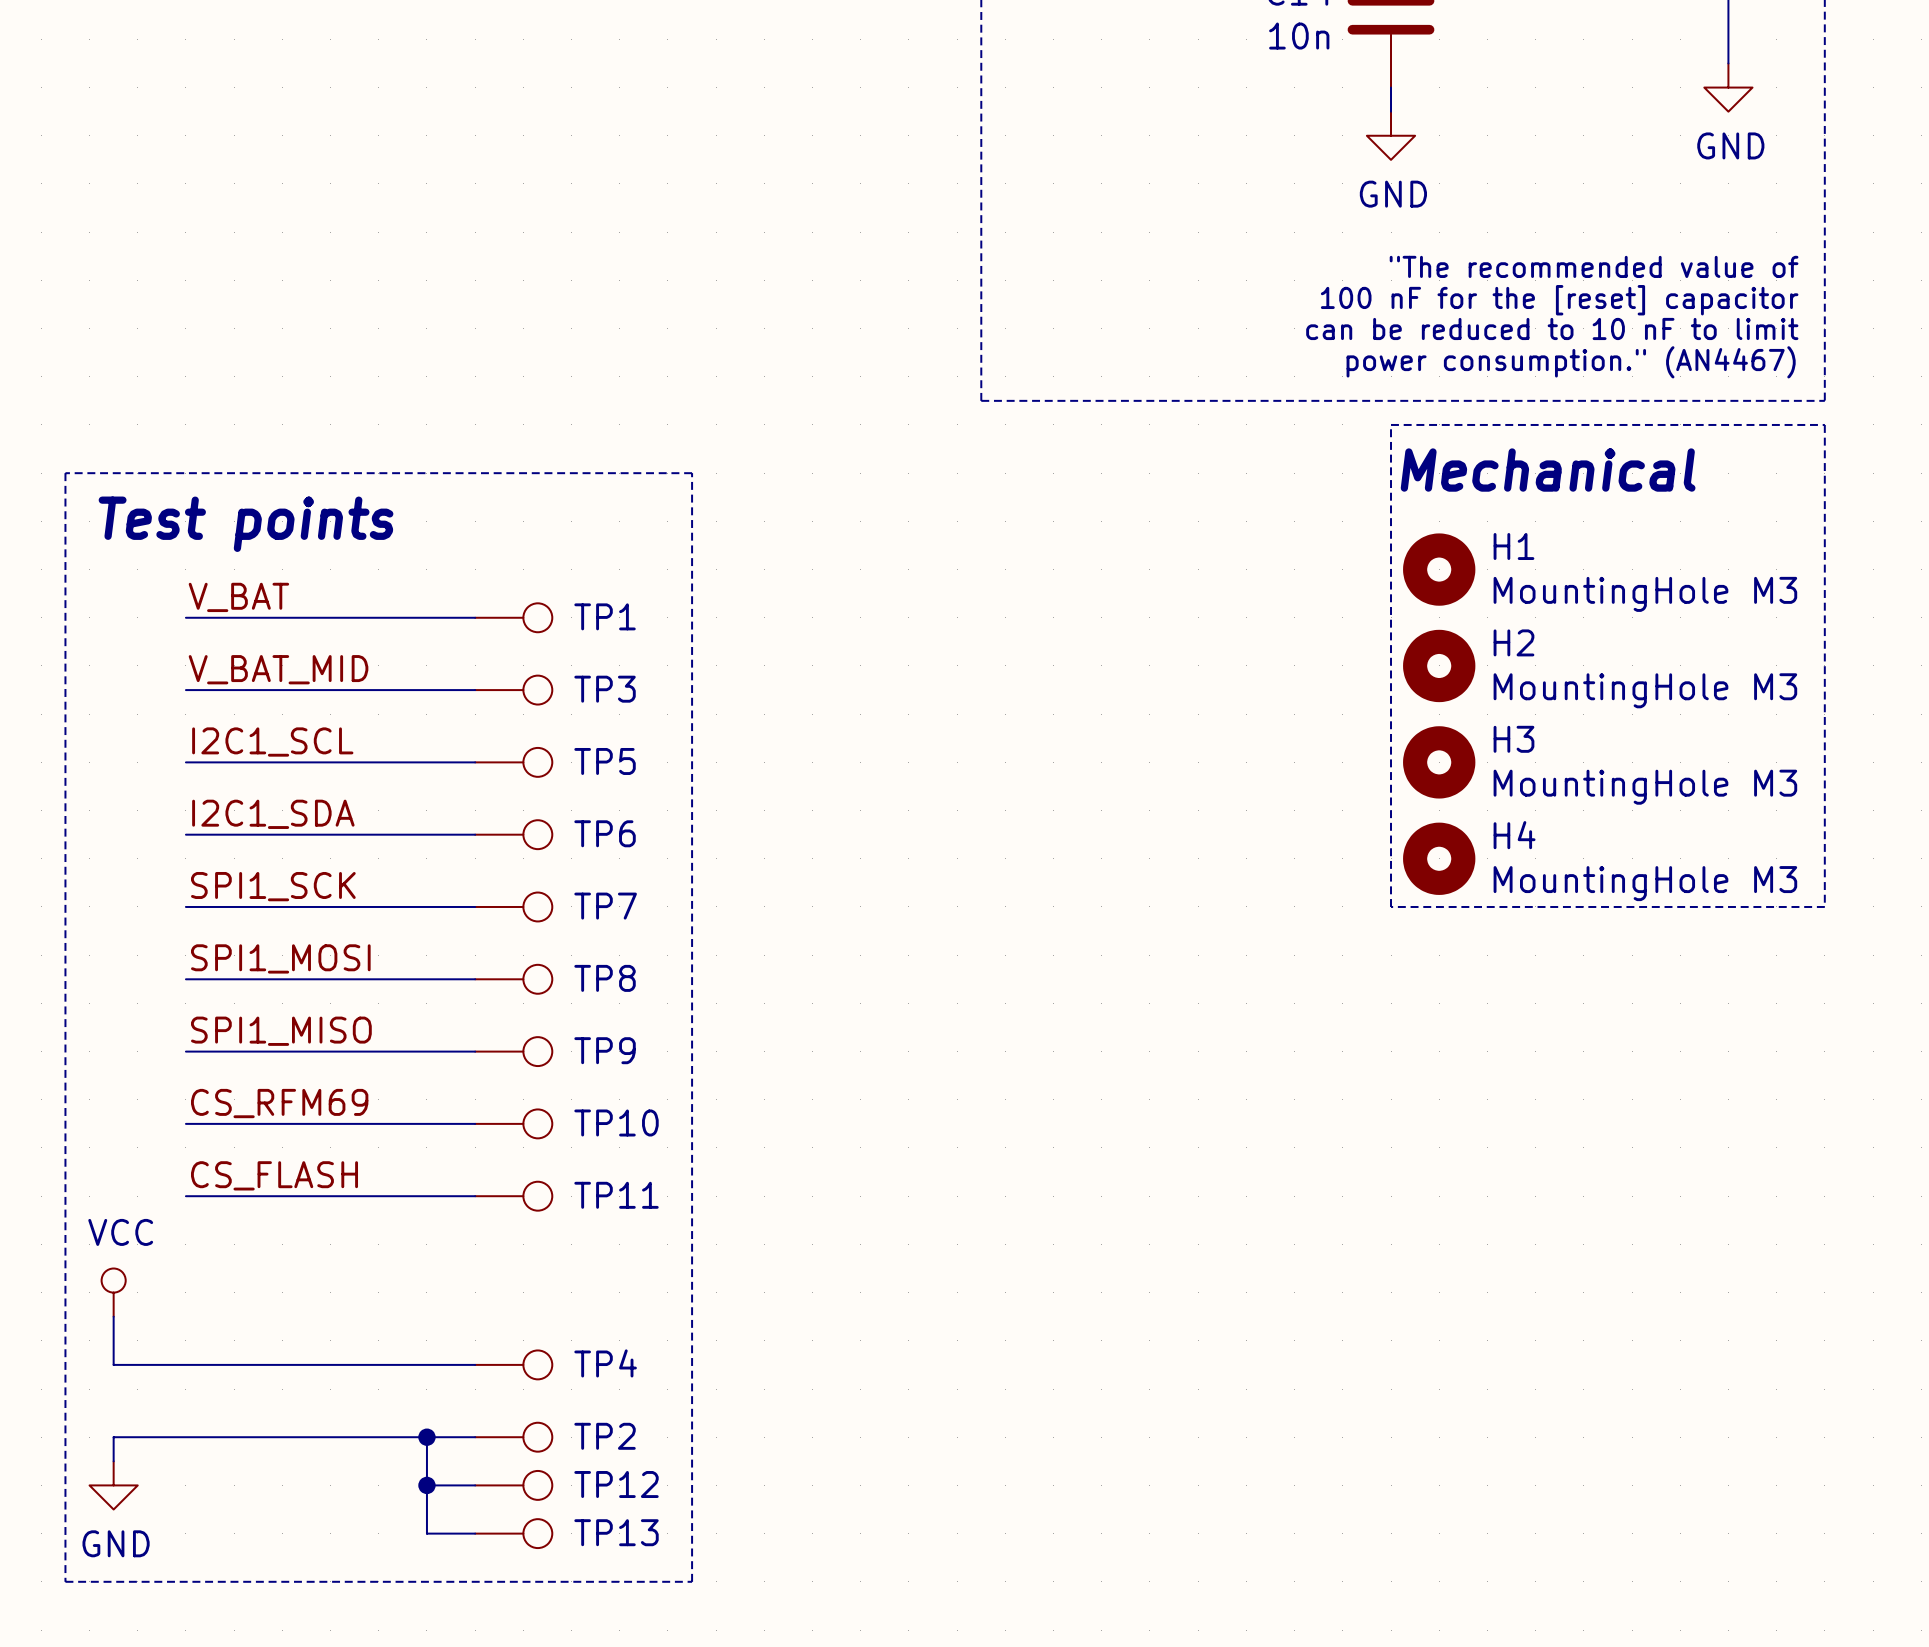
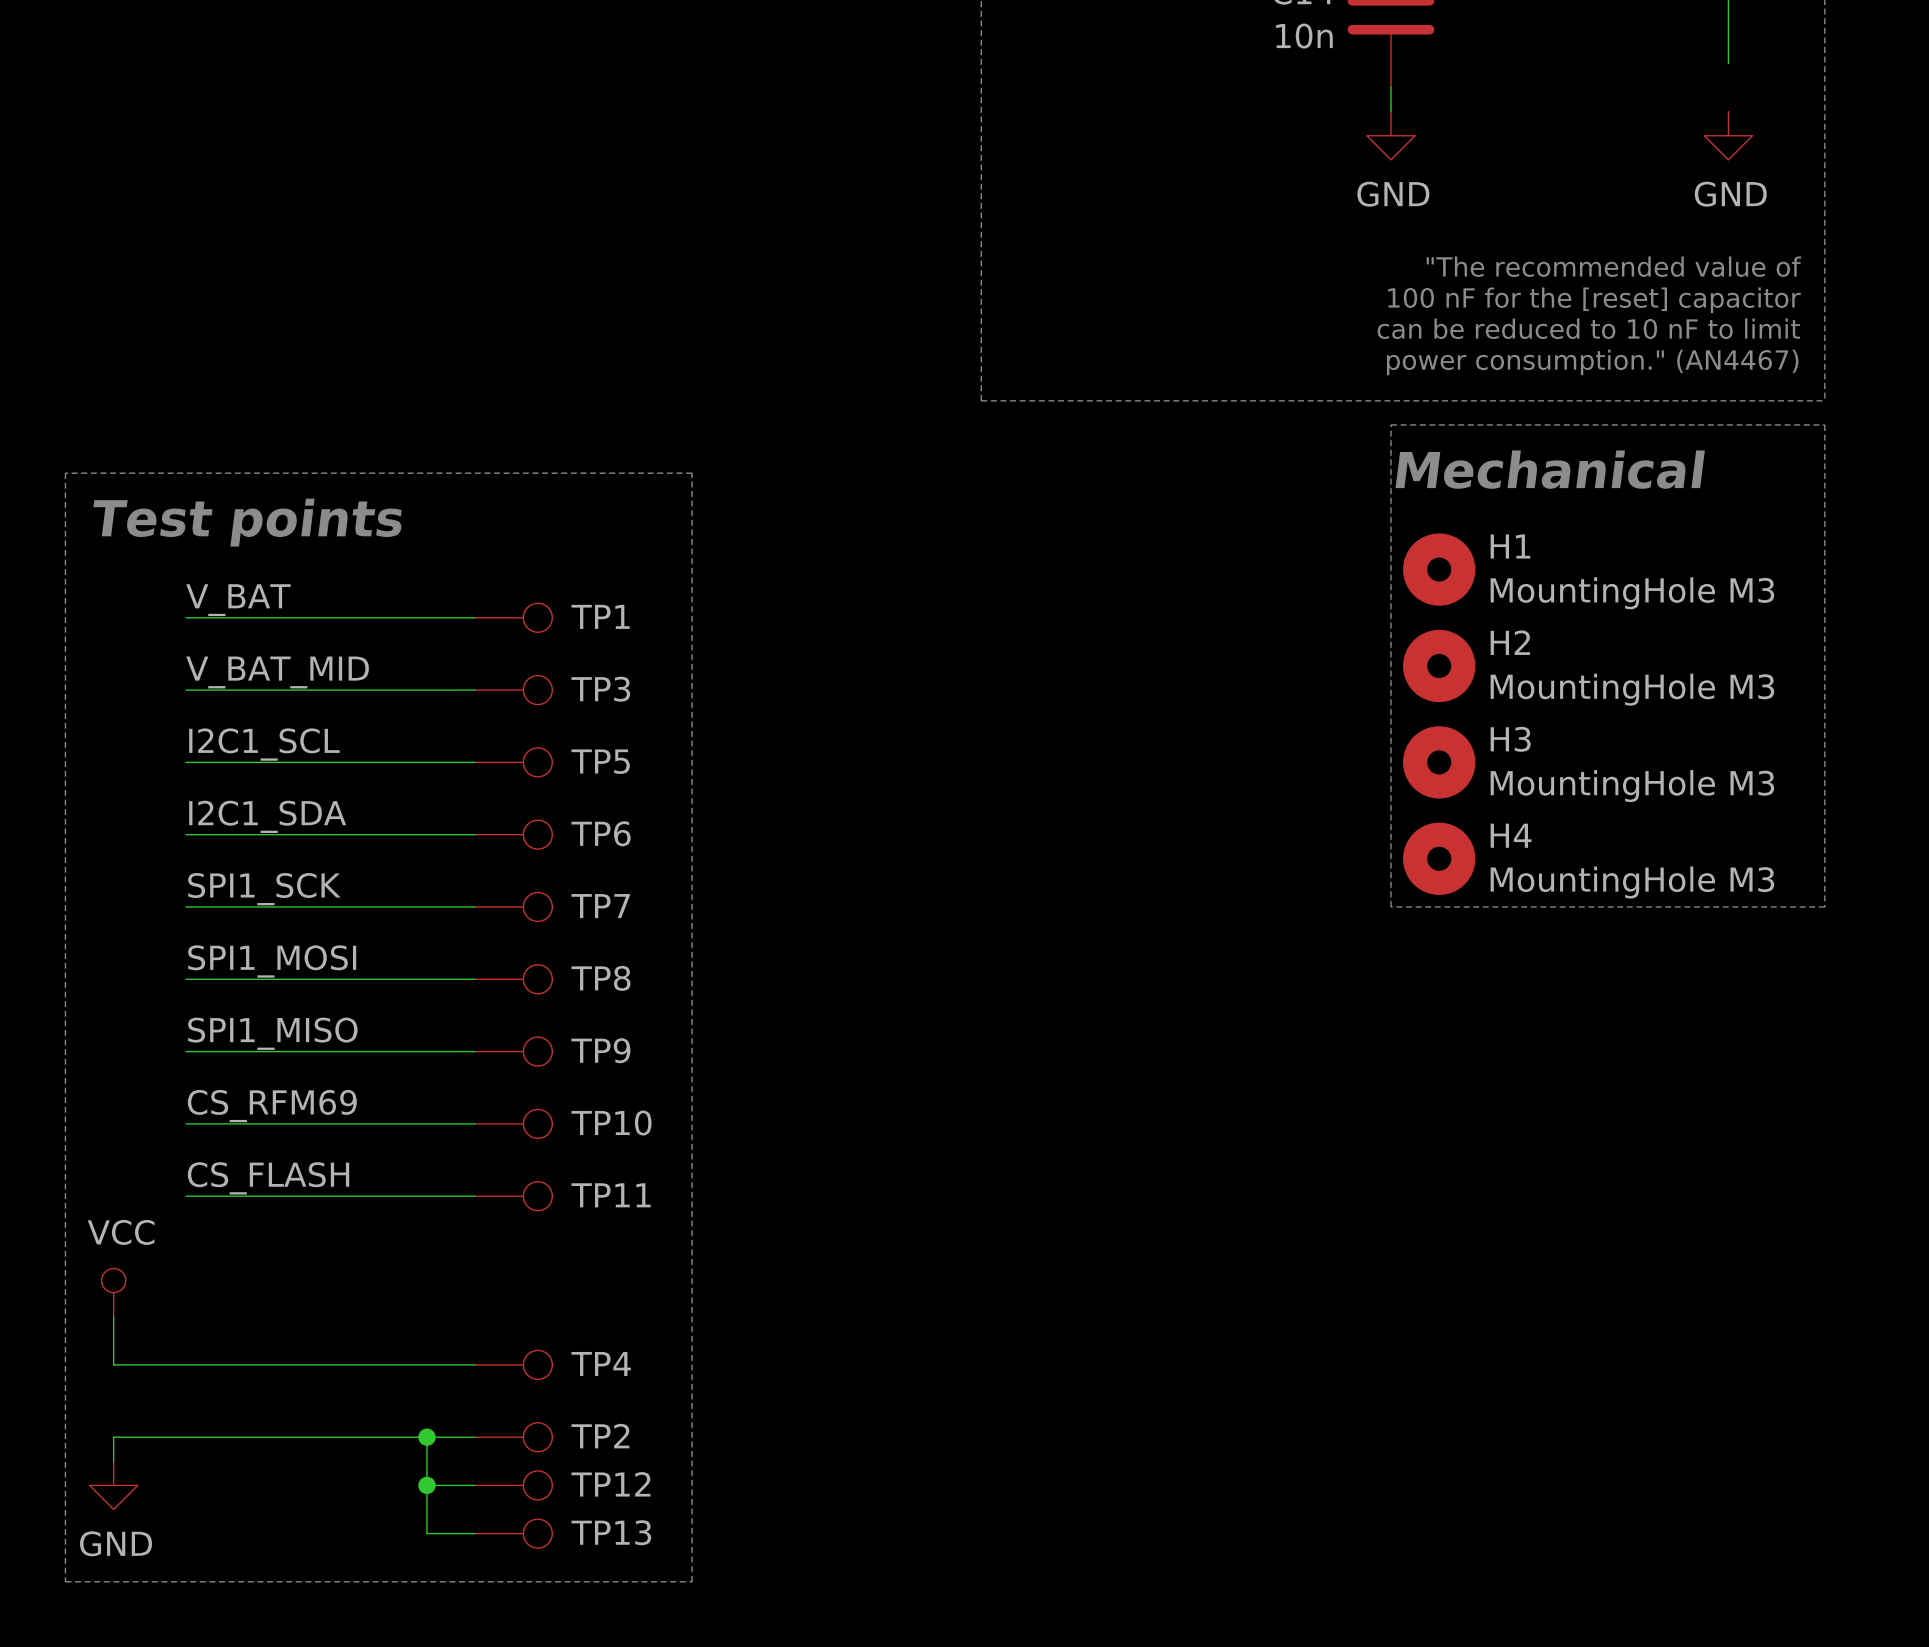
power symbol position: GND (1728, 87) -> GND (1728, 135)

